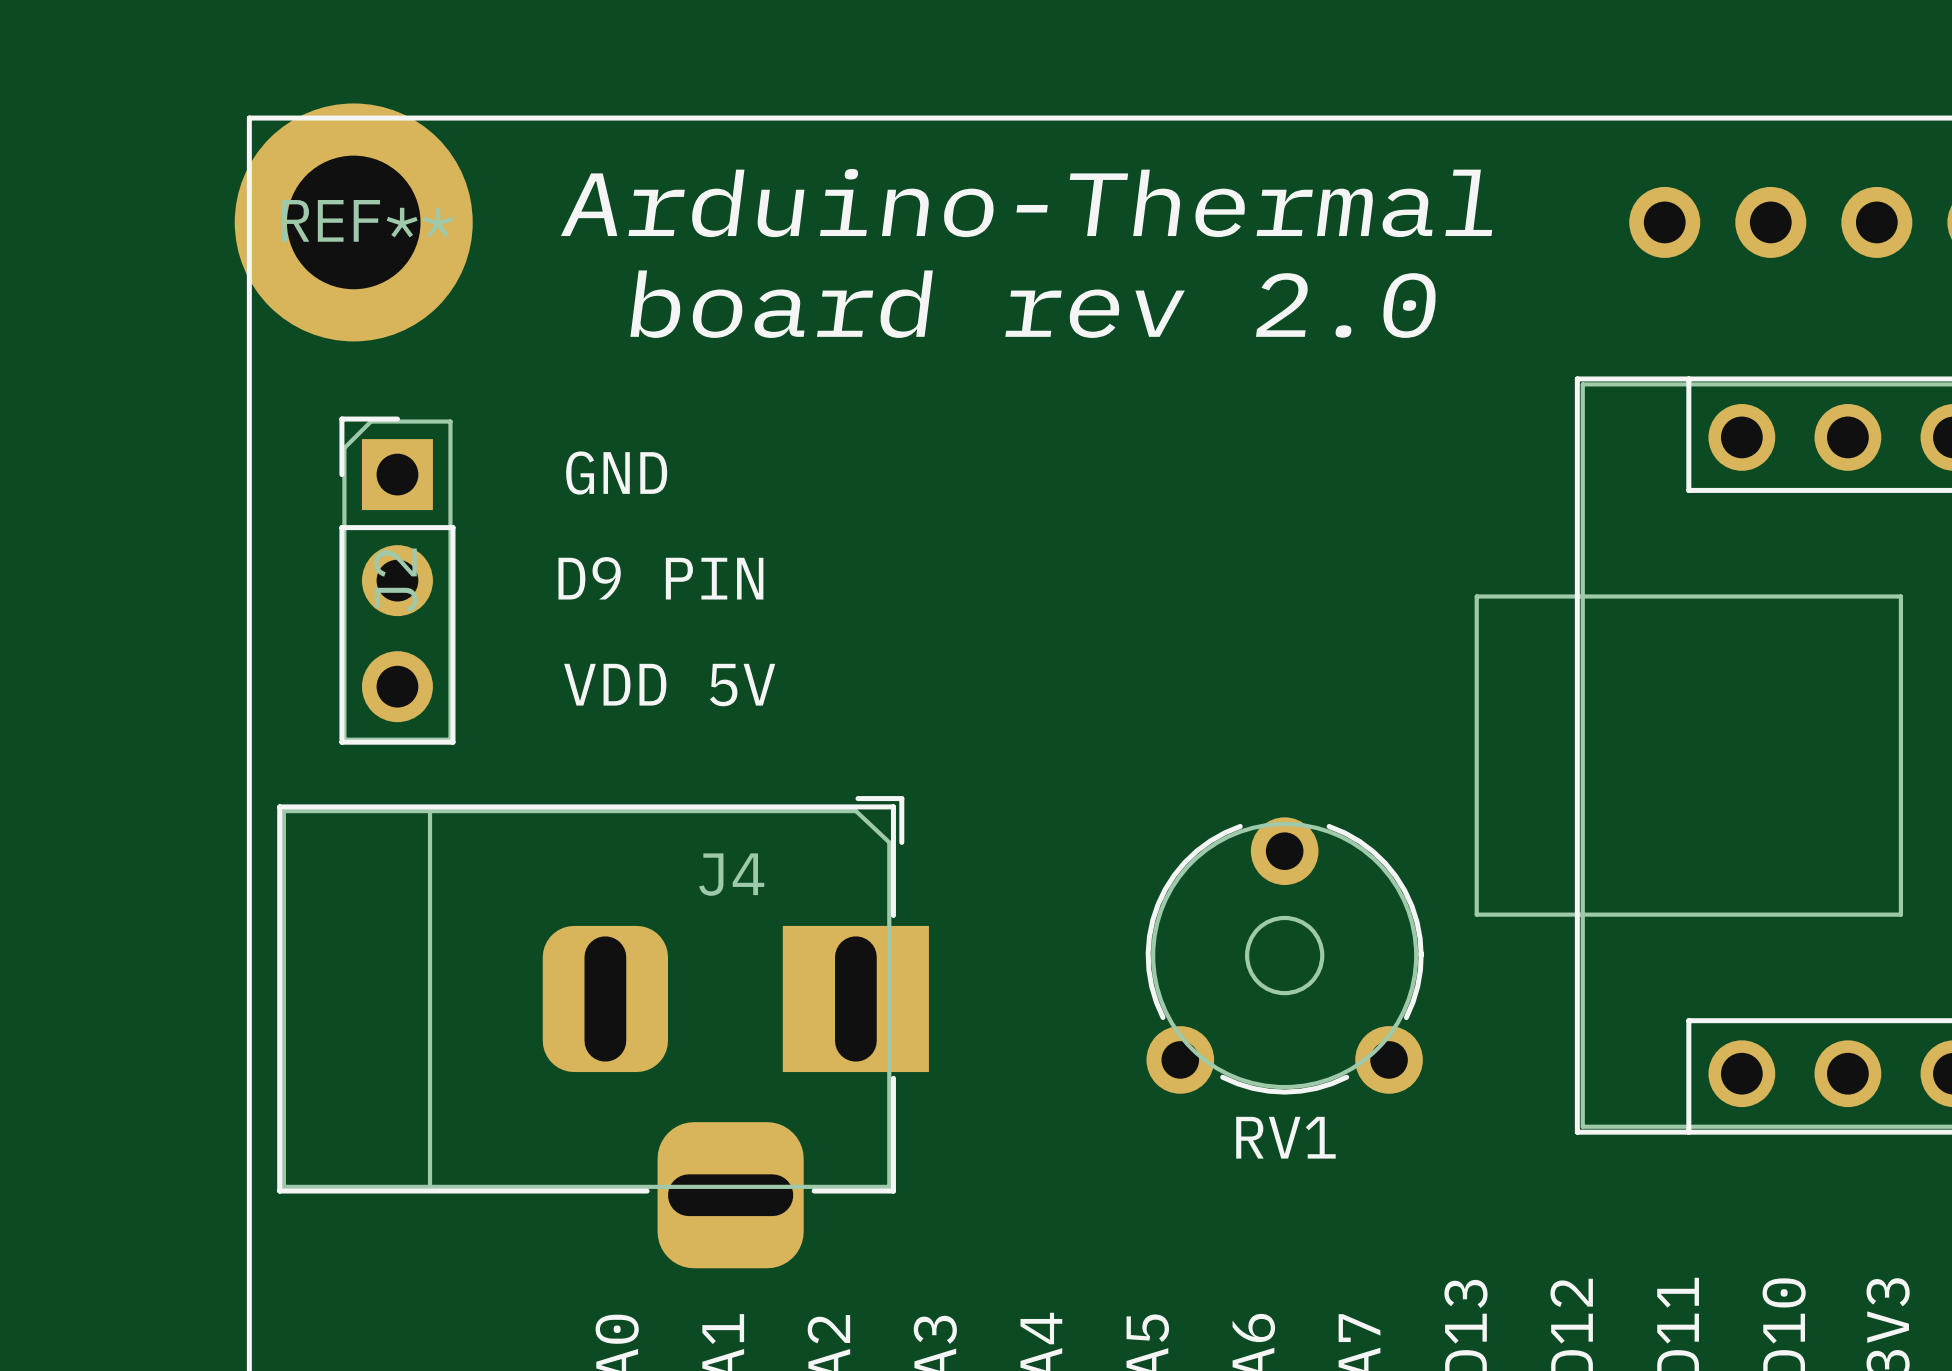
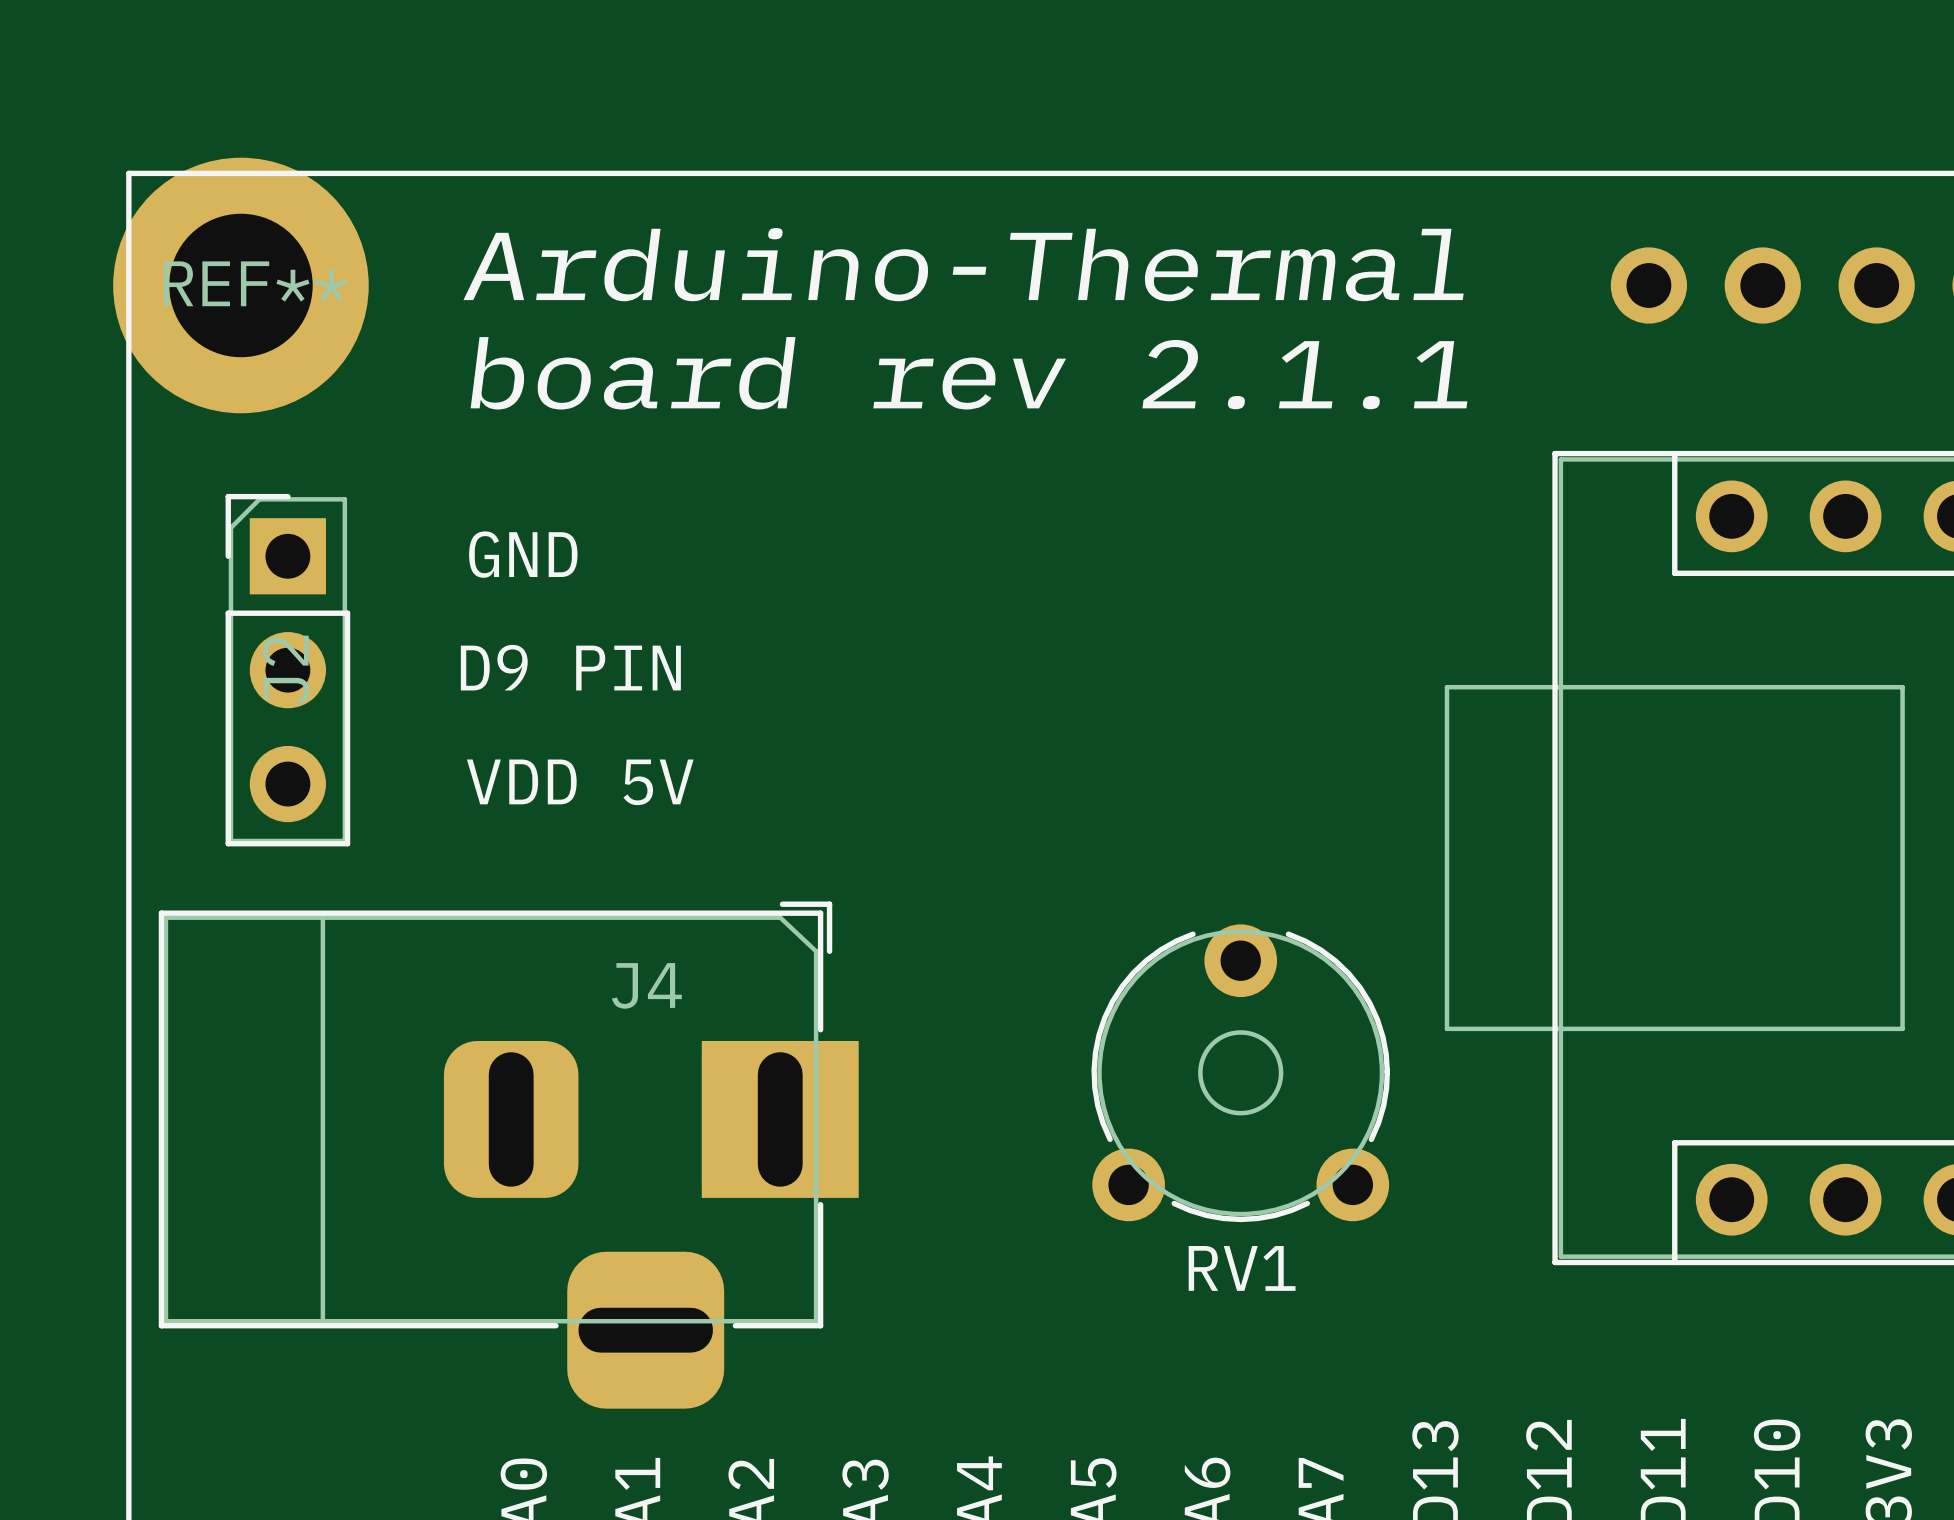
text: board rev 2.0 (1033, 304) -> board rev 2.1.1 (969, 373)

